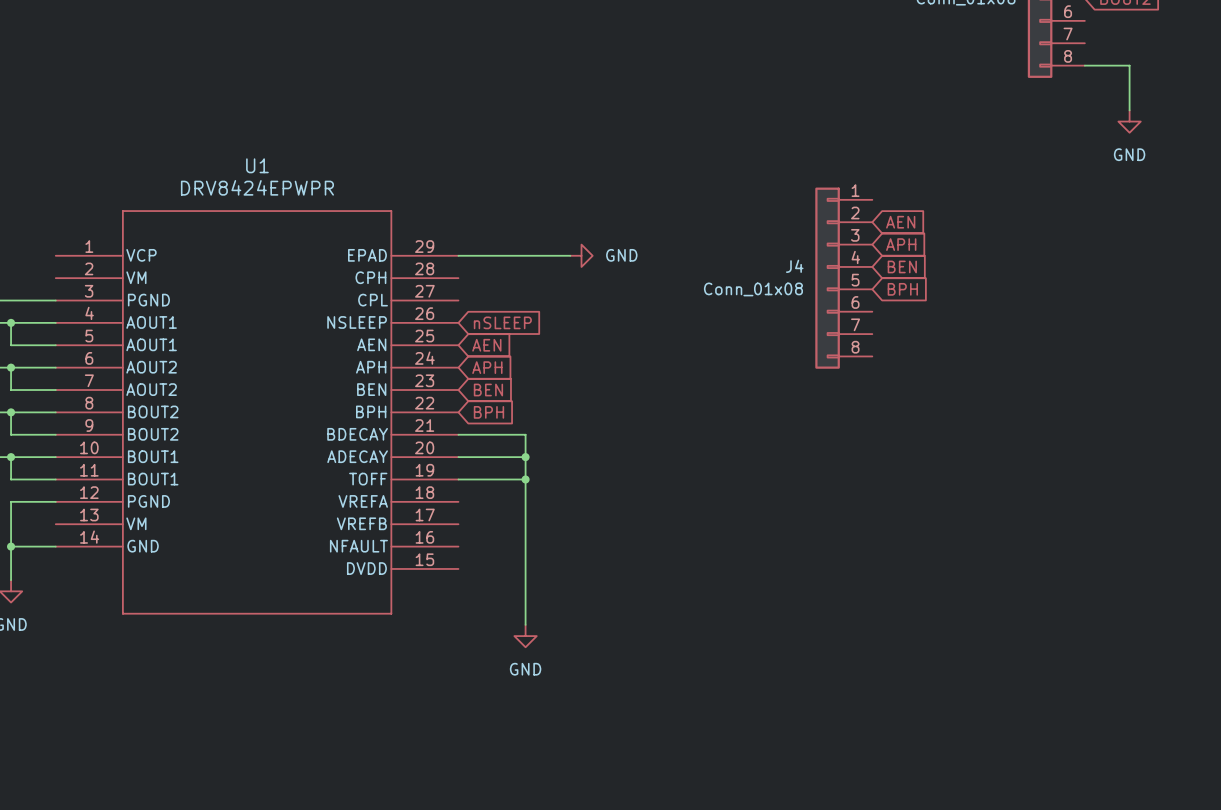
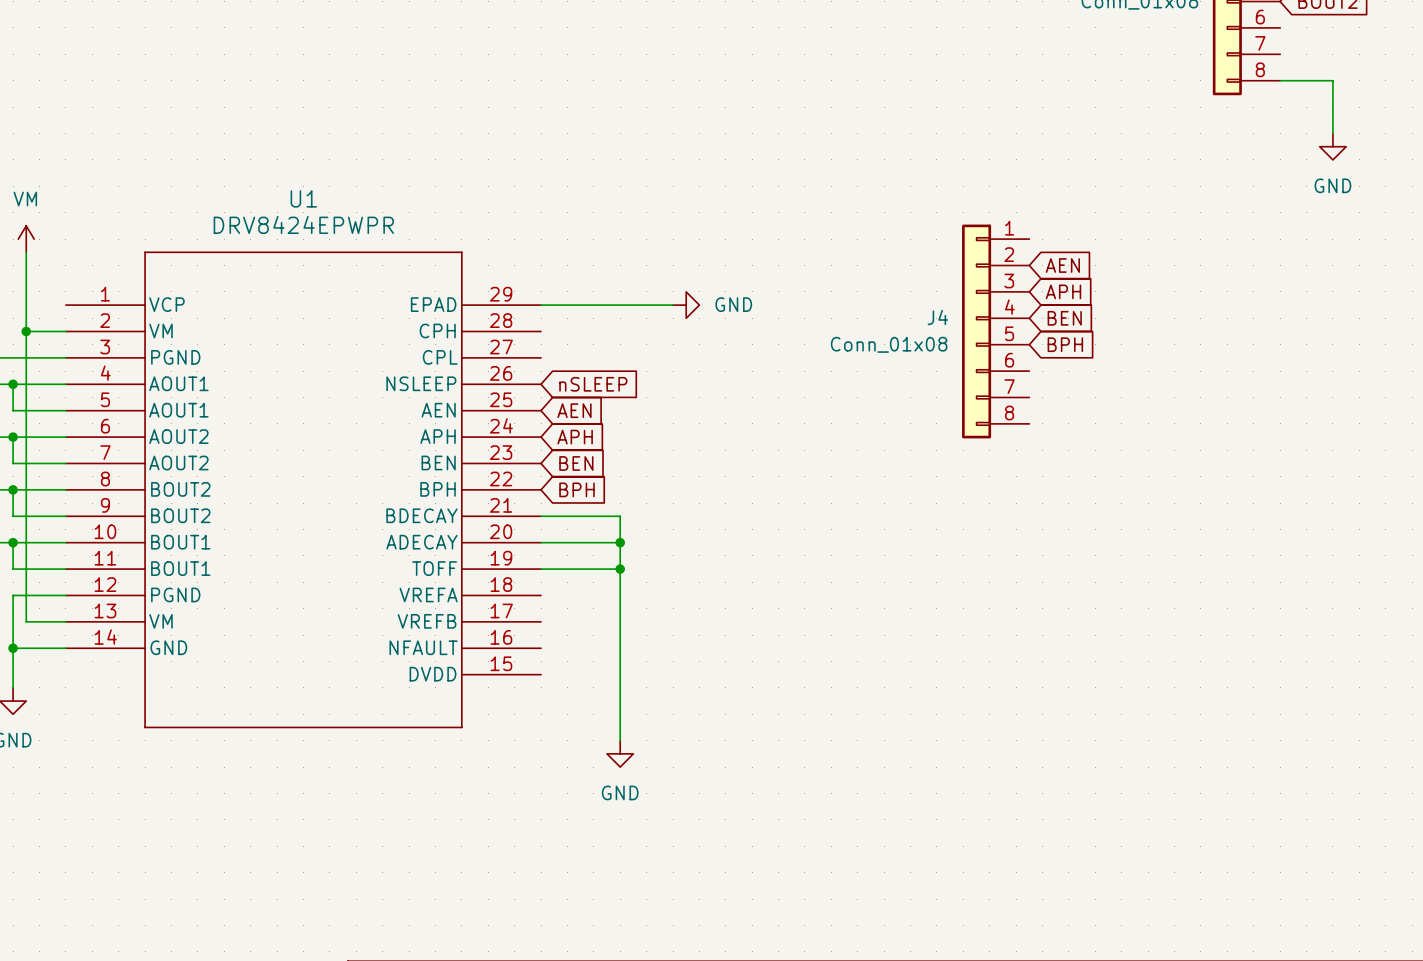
power symbol: none -> VM (26, 239)
wire: none -> (26, 252) (26, 621) (65, 621)
wire: none -> (26, 331) (65, 331)
junction: none -> (26, 331)

